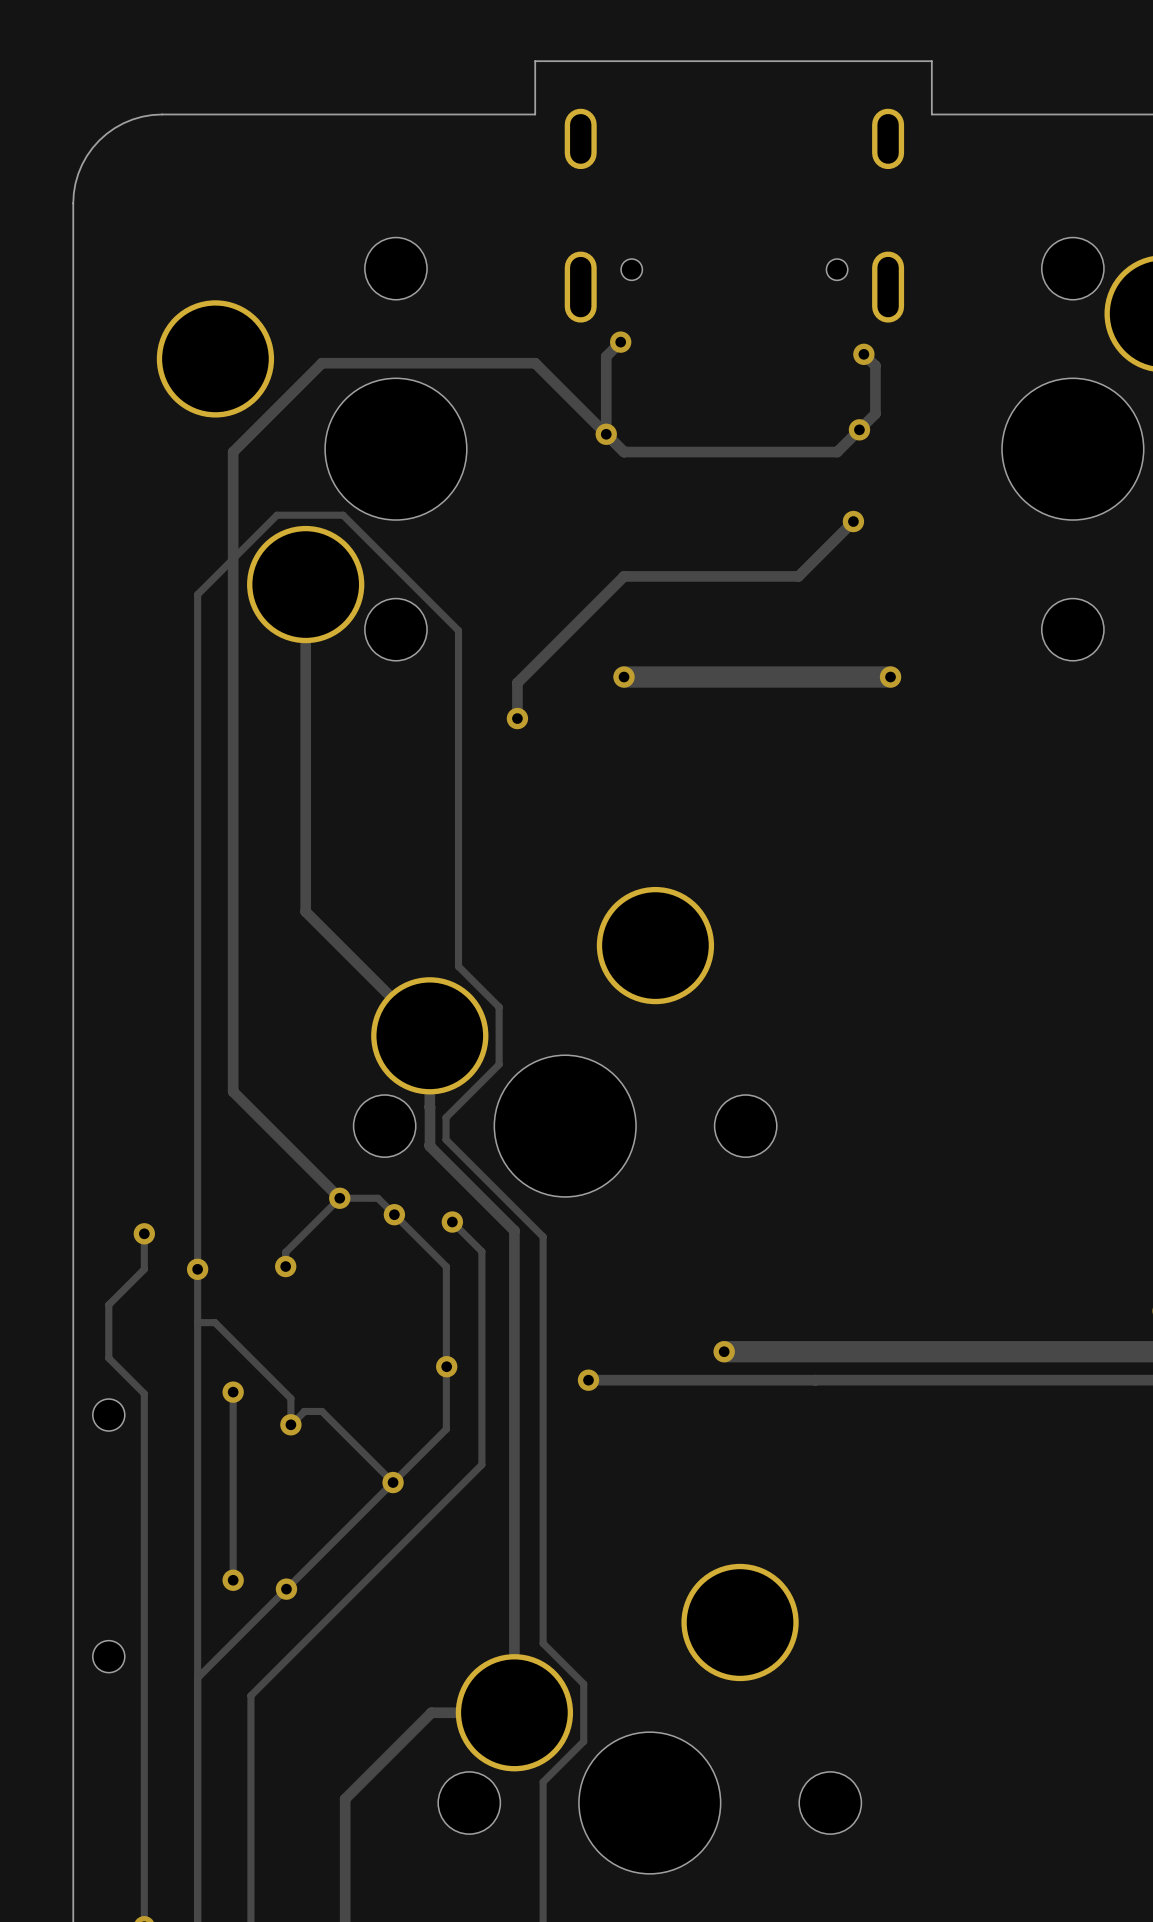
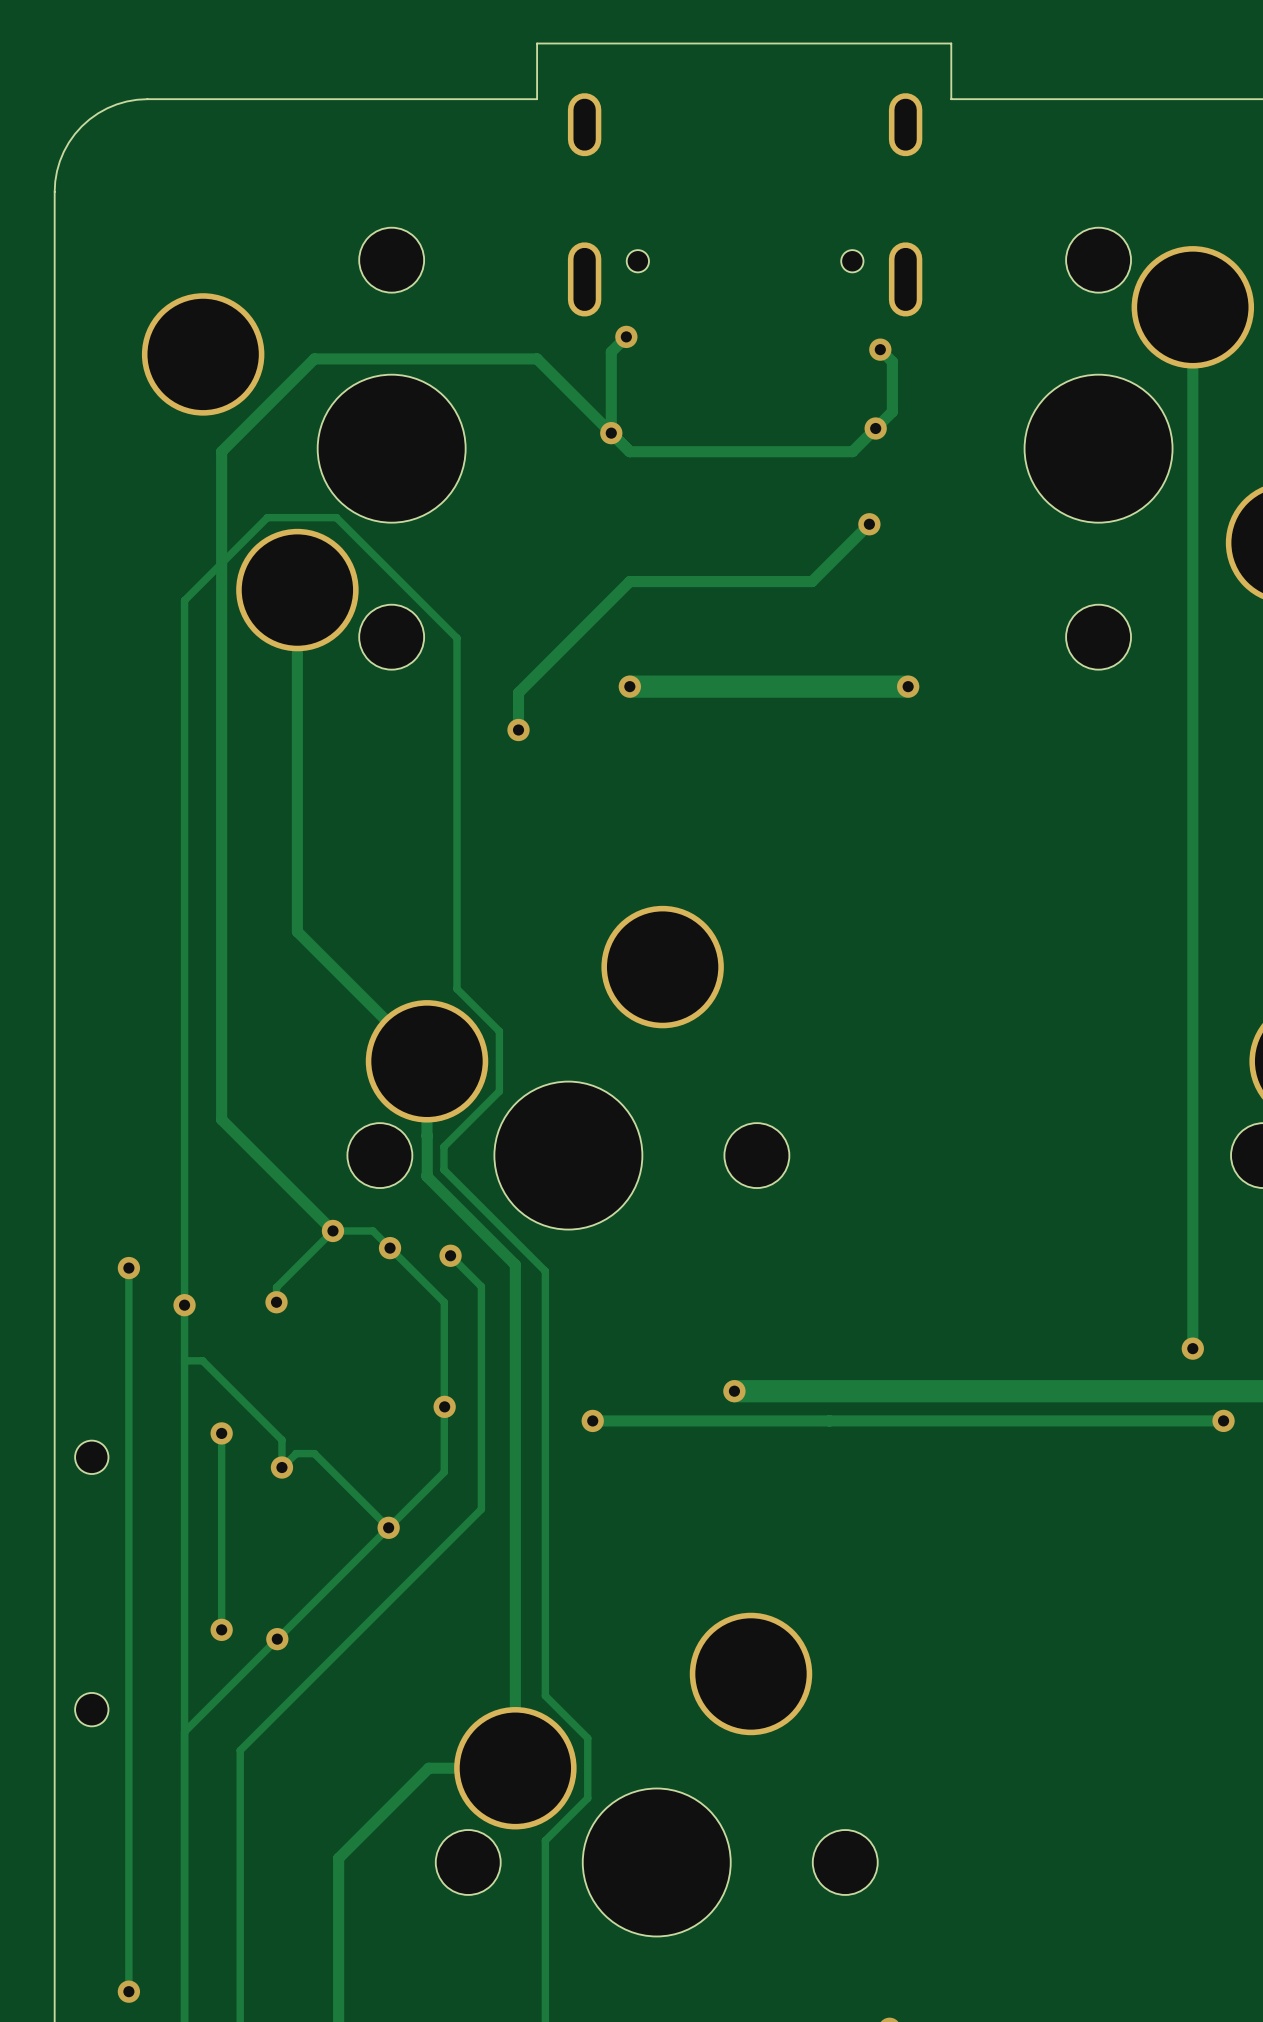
track: (144, 1269) (108, 1304) (108, 1358) (144, 1393) -> (128, 1305) (128, 1435)

